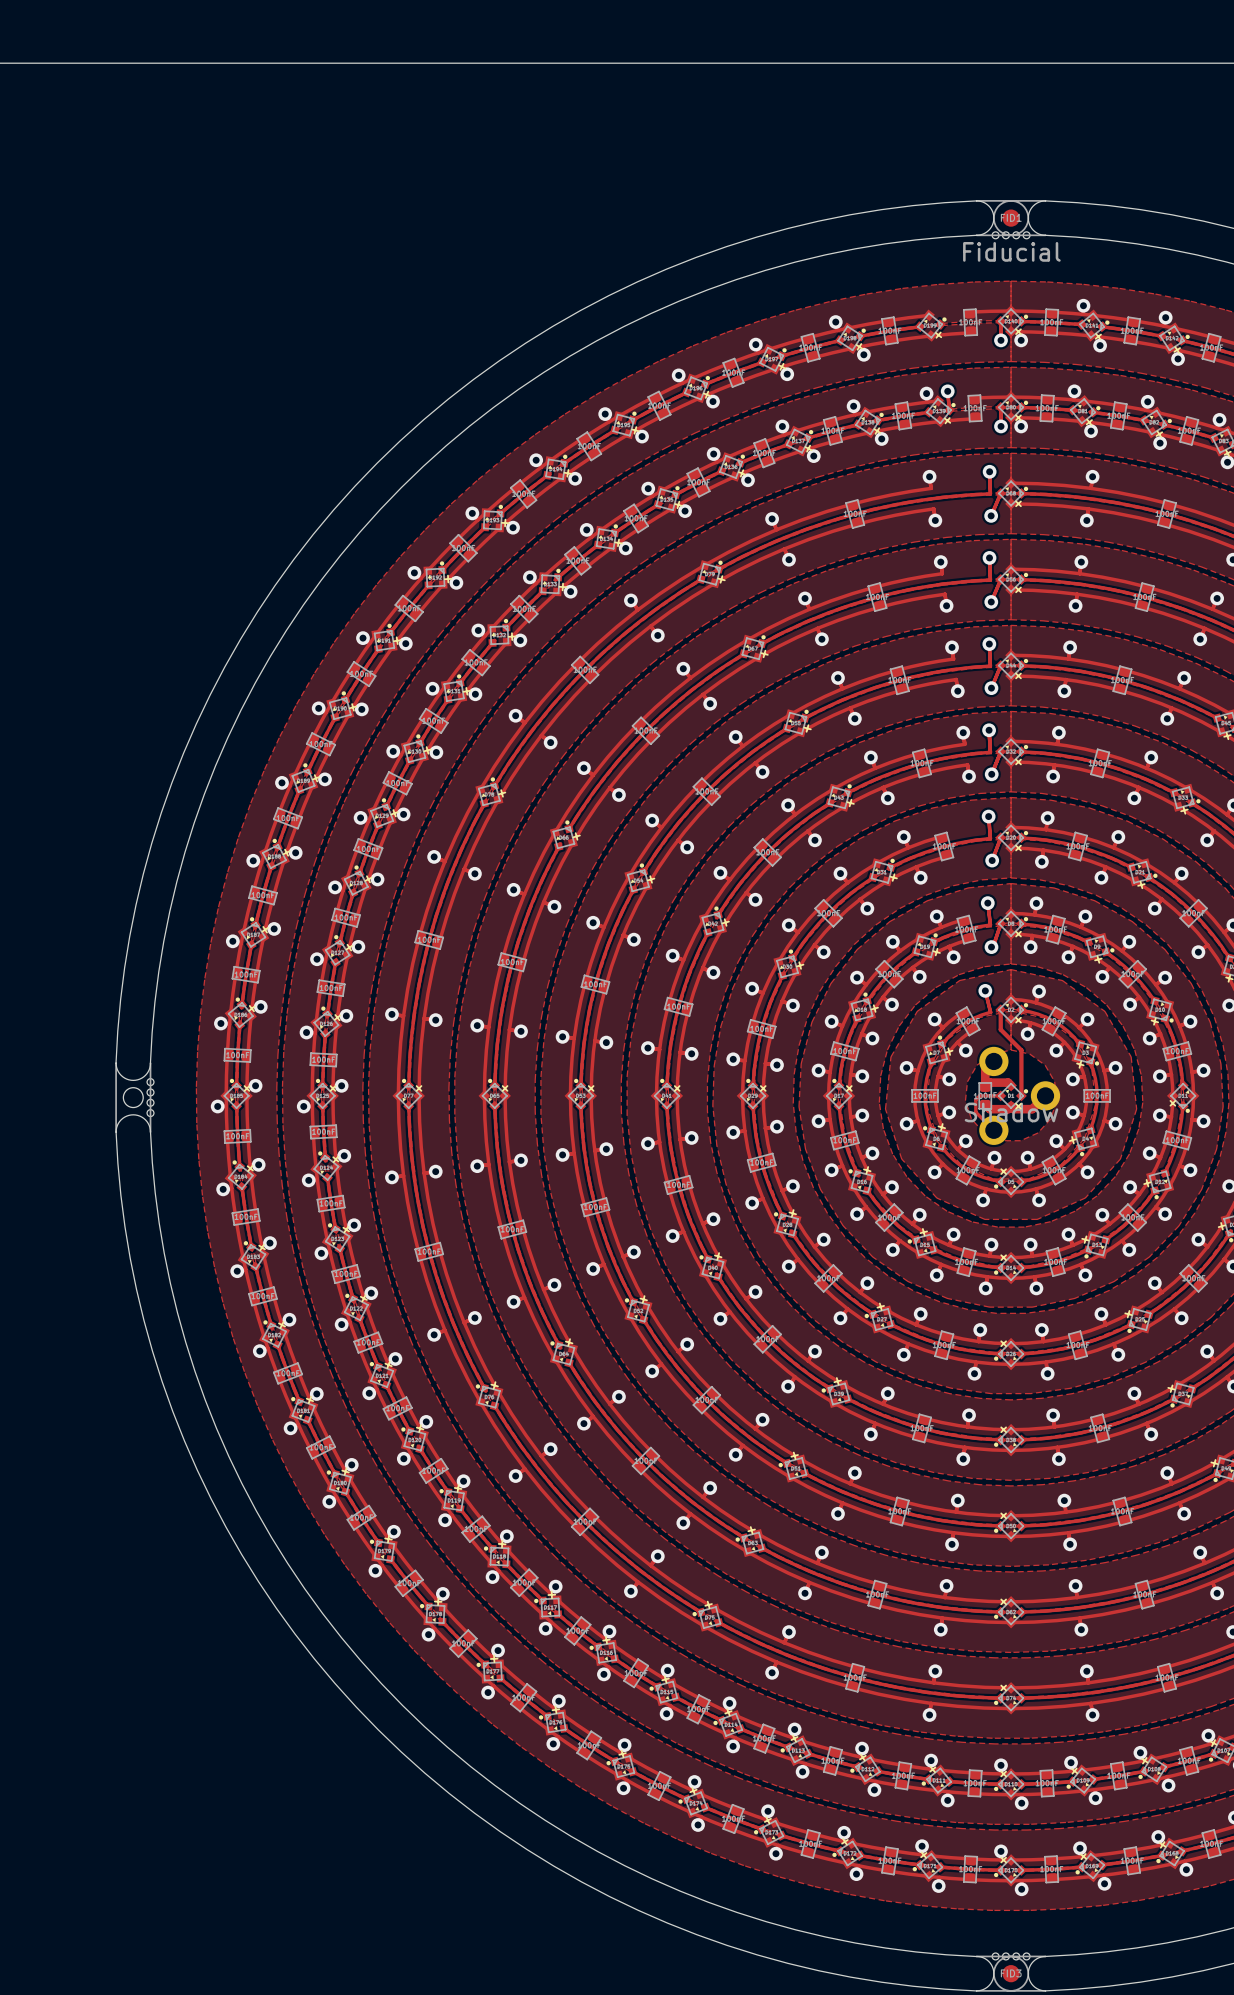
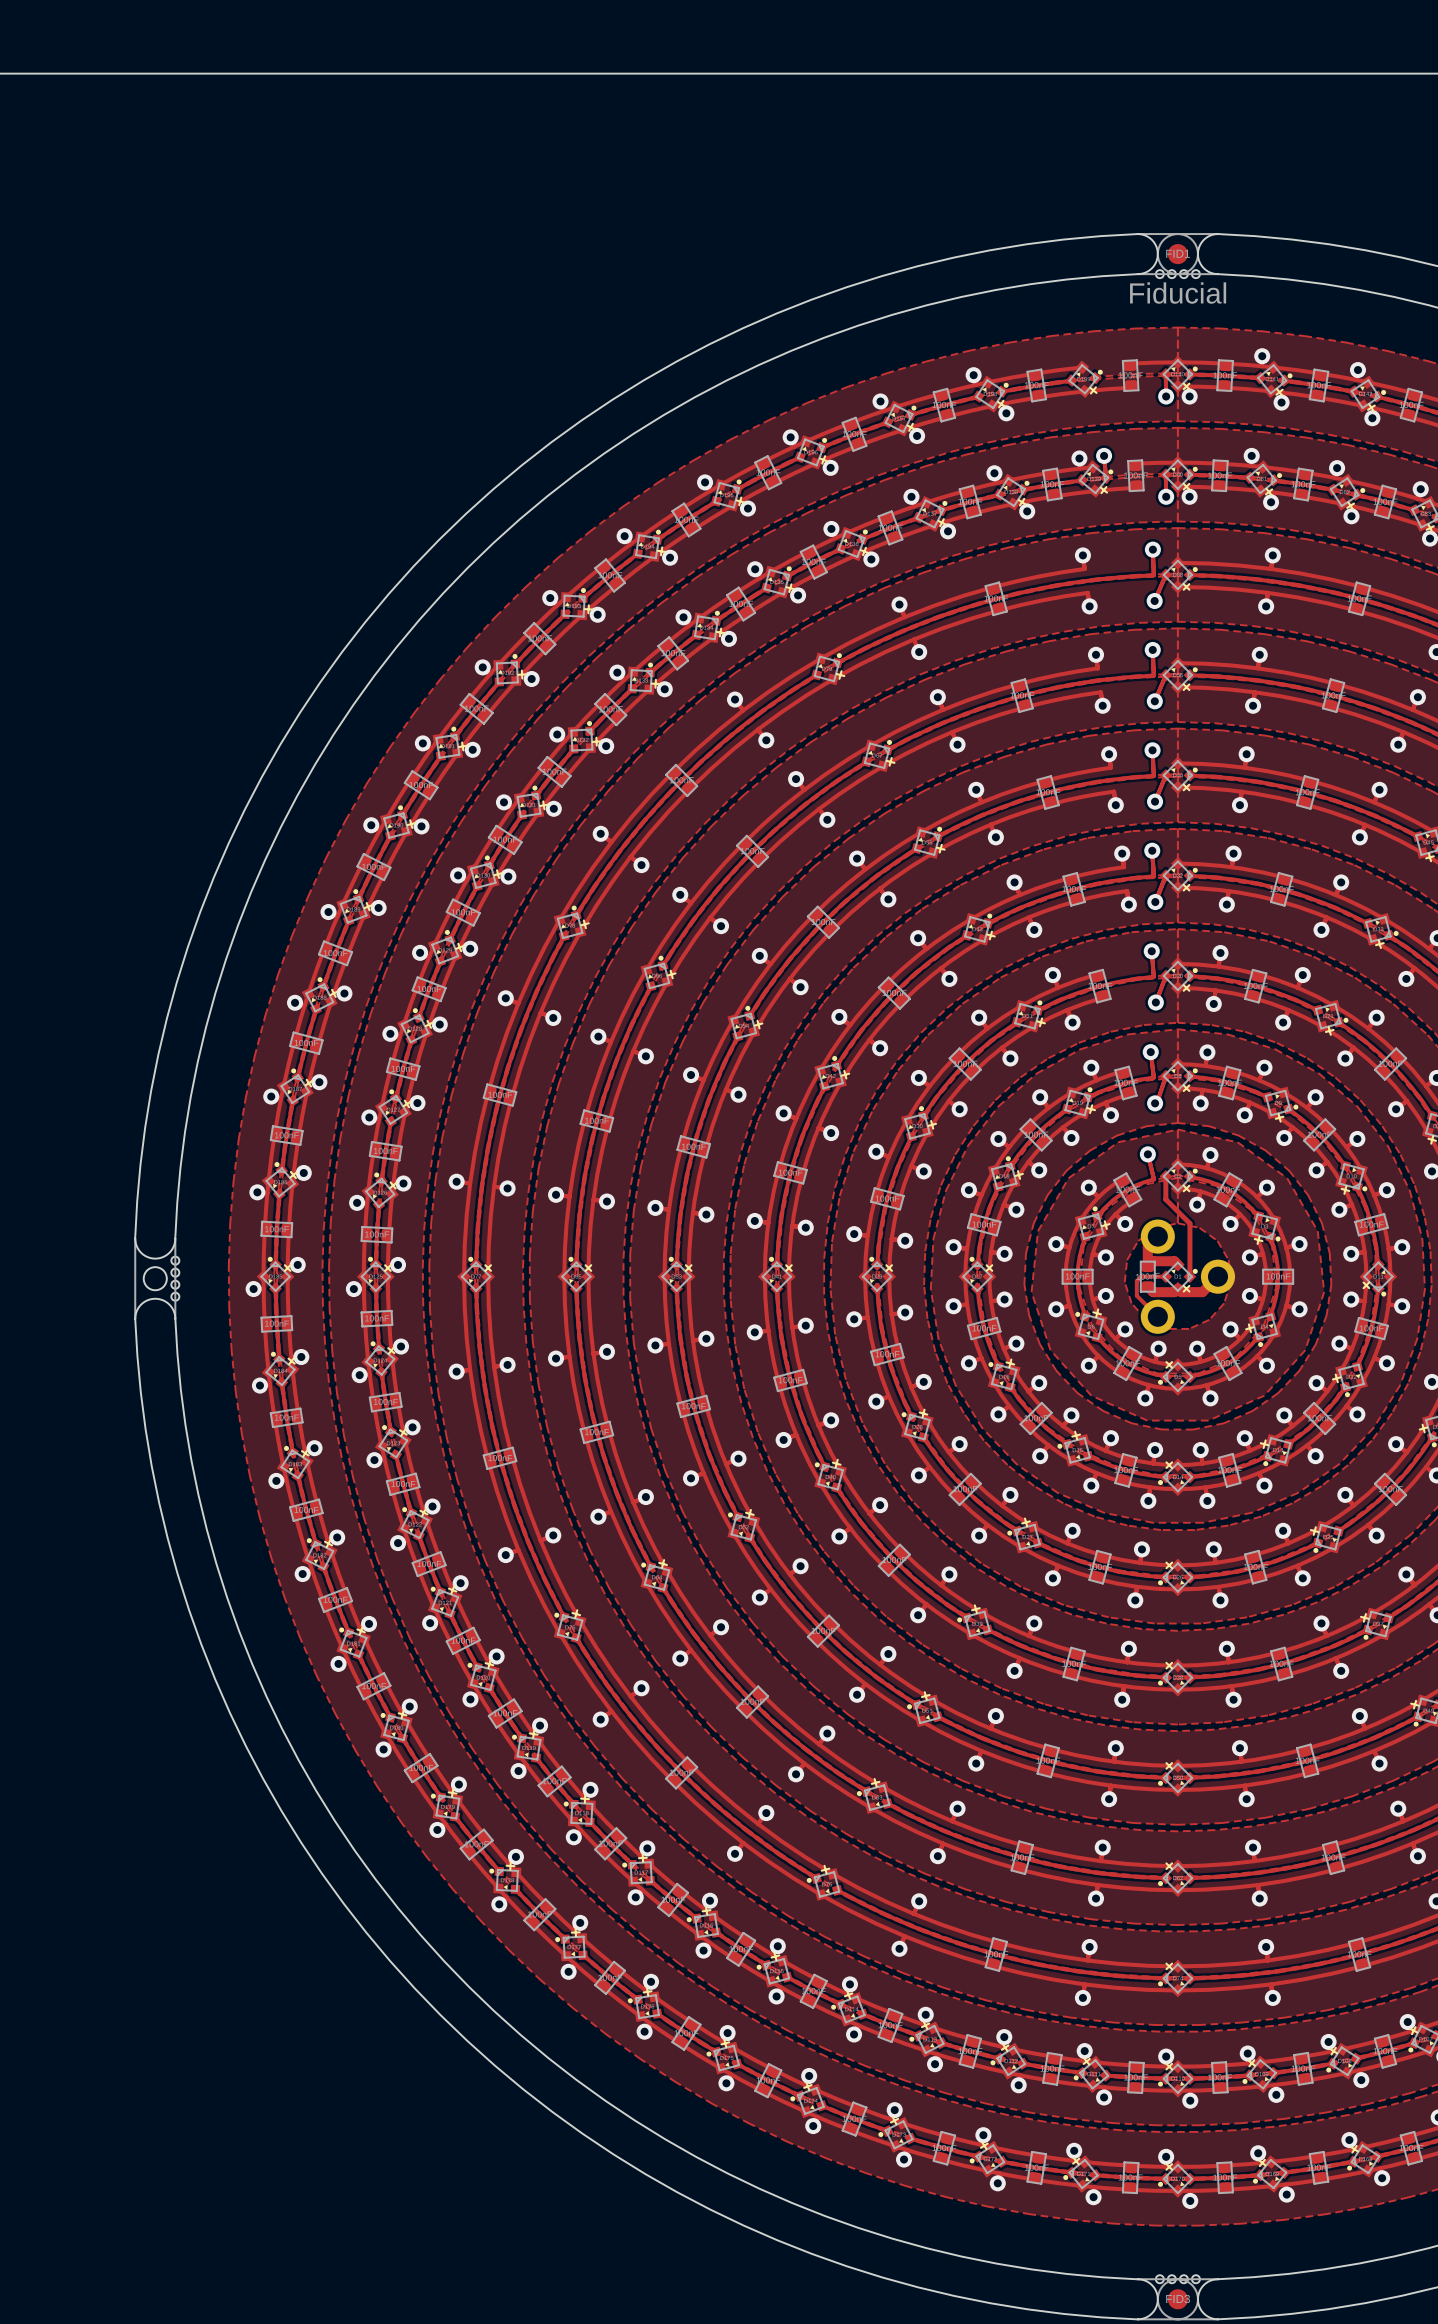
drawing: [964, 1102, 1059, 1123] -> none

